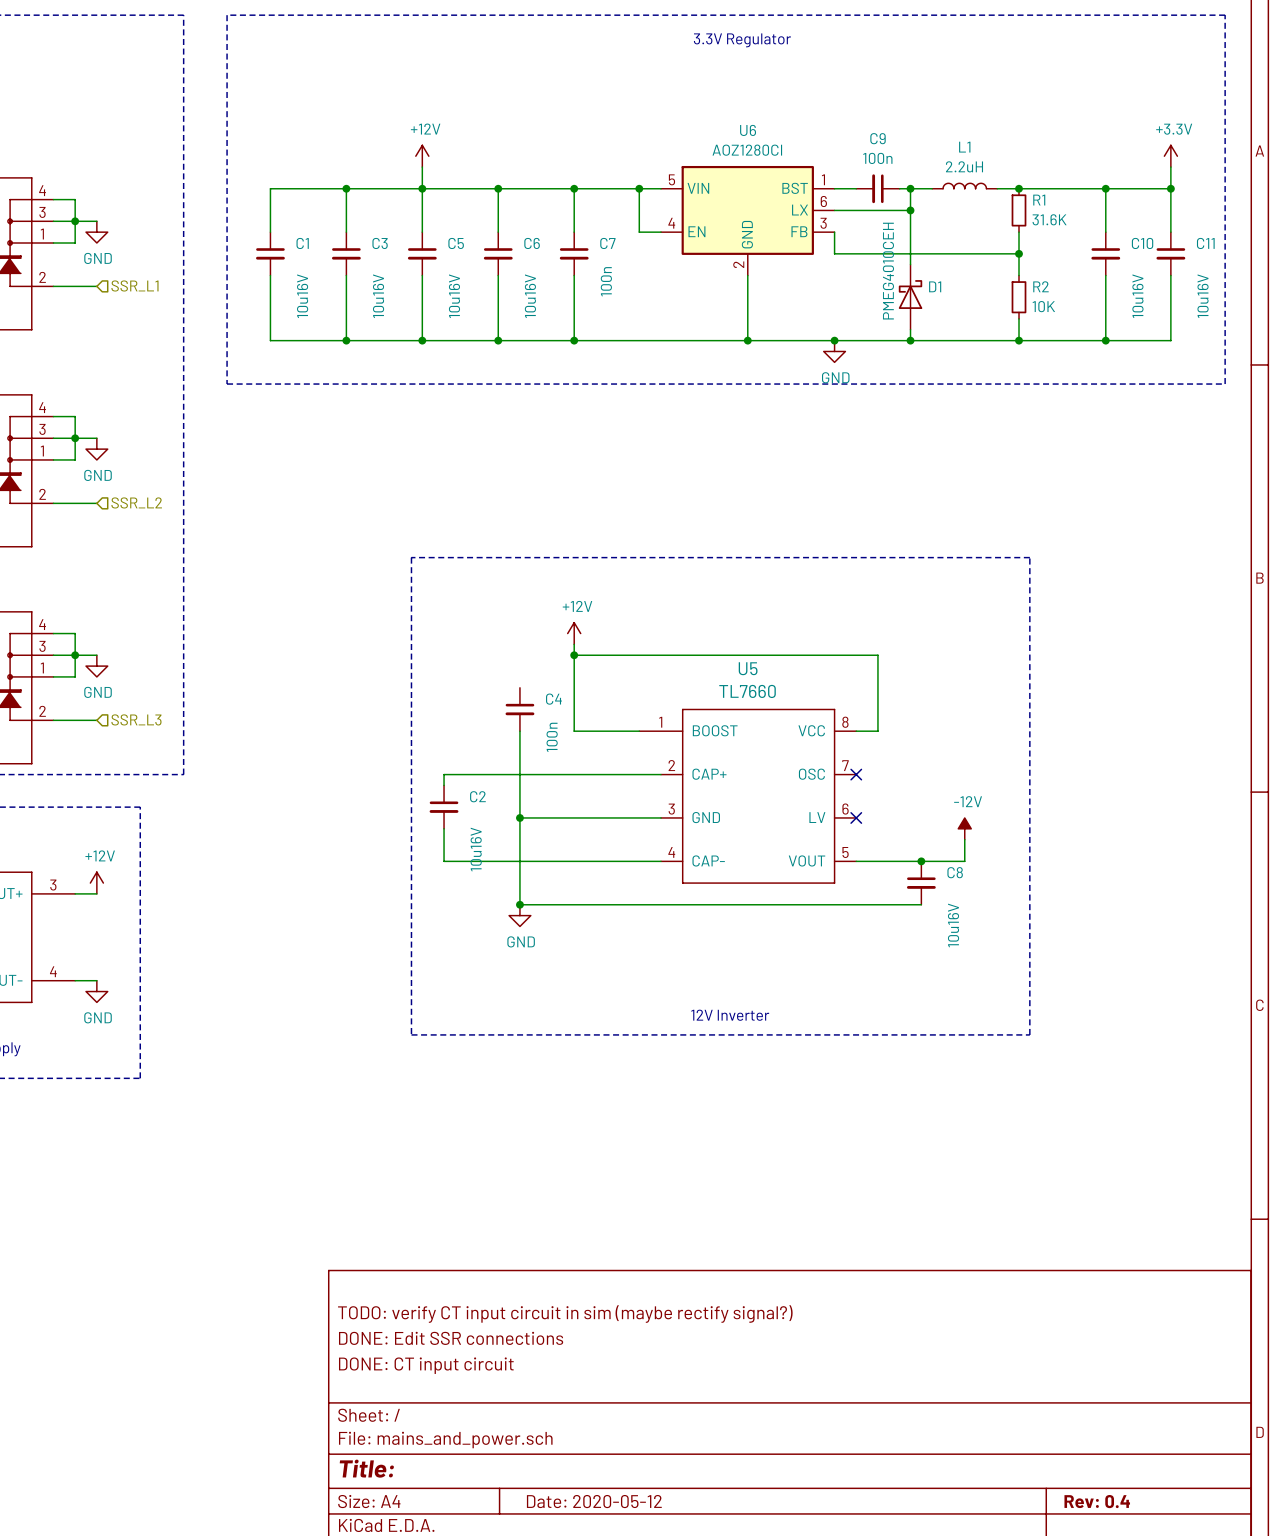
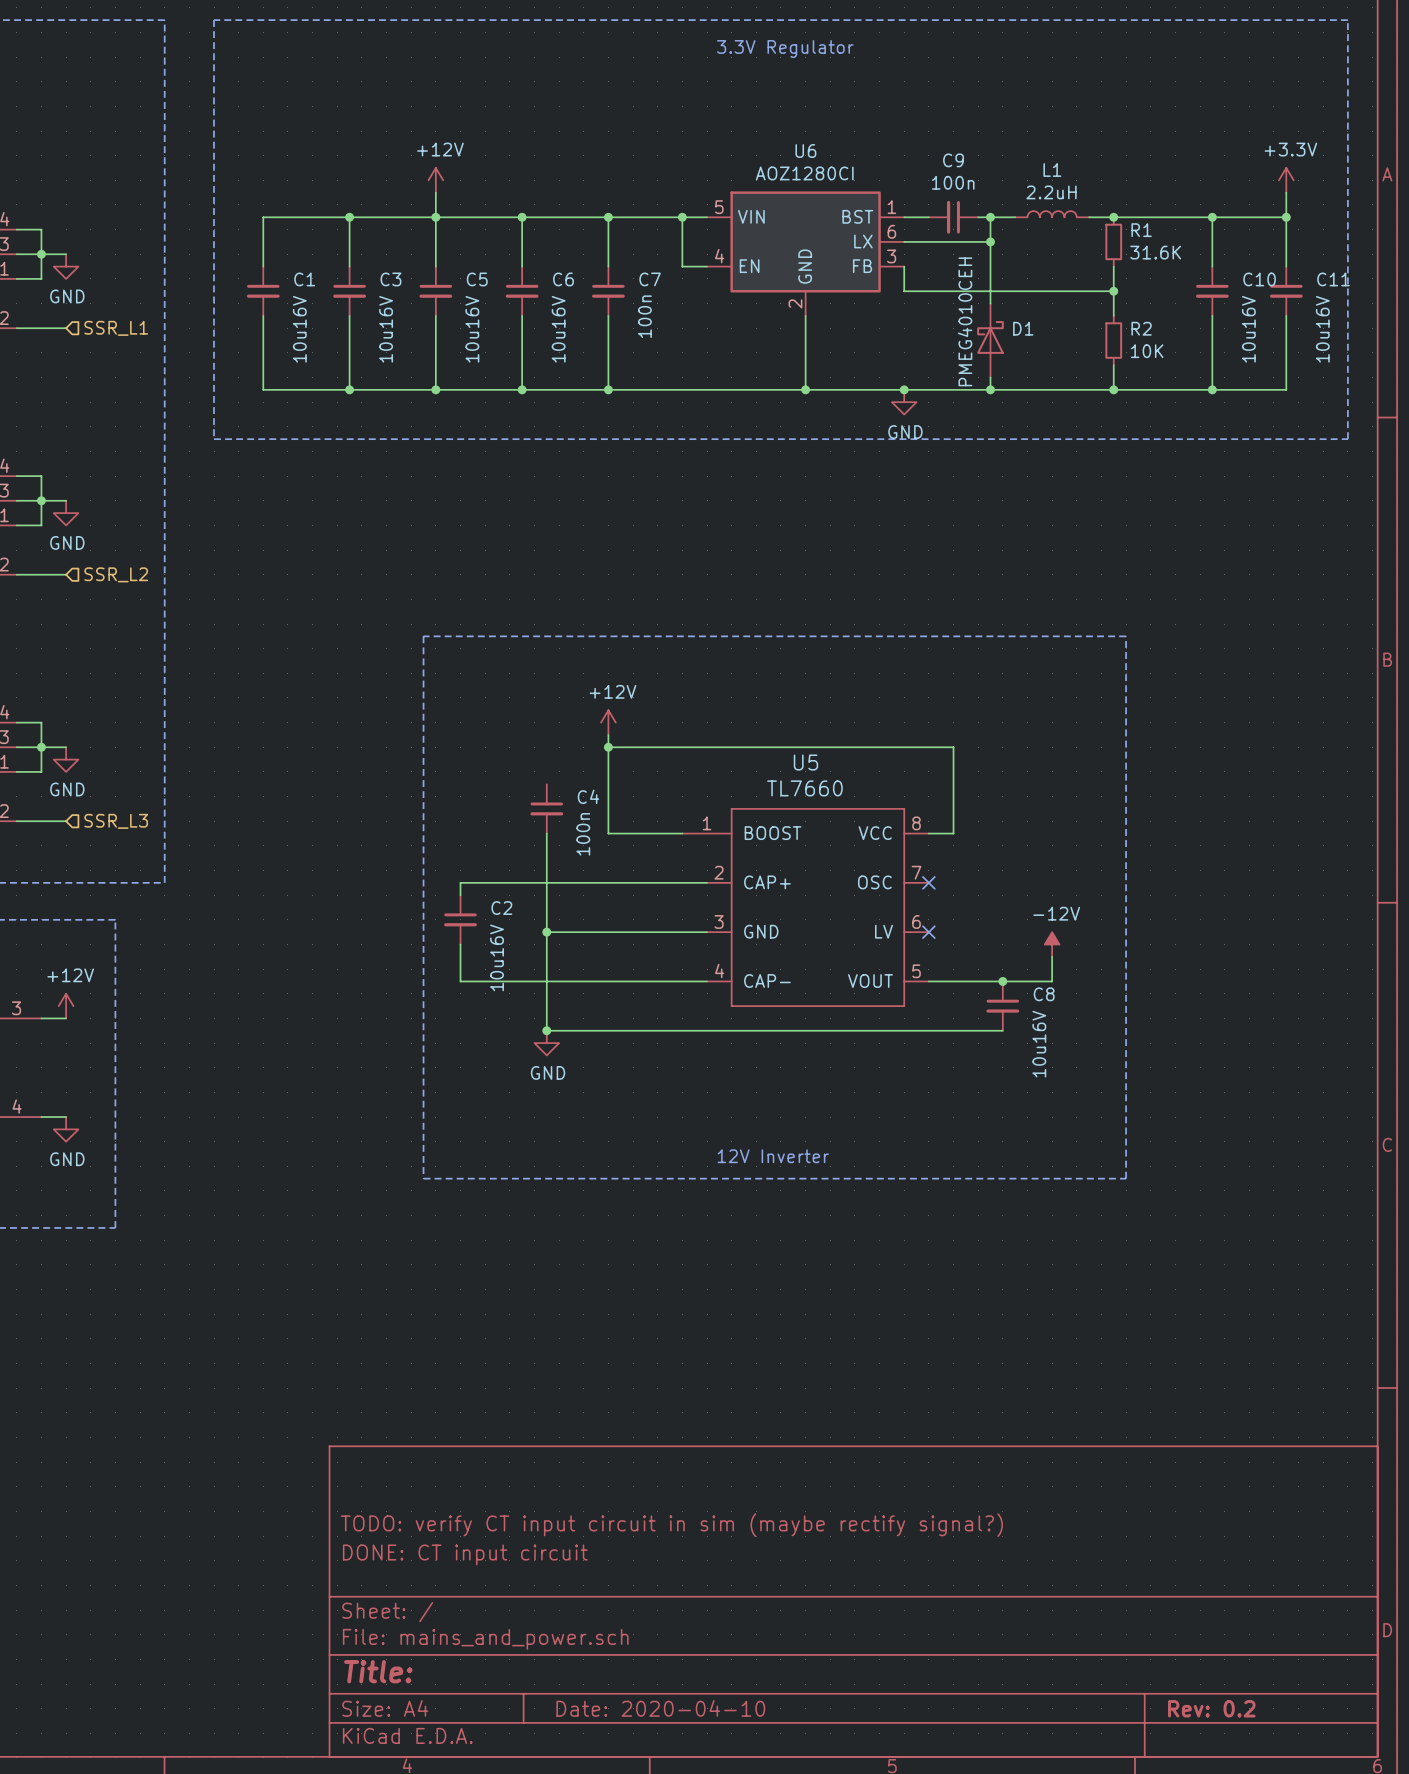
title block: TODO: verify CT input circuit in sim (maybe rectify signal?) (565, 1314) -> none
title block: DONE: Edit SSR connections (451, 1338) -> TODO: verify CT input circuit in sim (maybe rectify signal?) (671, 1525)
title block: Date: 2020-05-12 (594, 1501) -> Date: 2020-04-10 (660, 1708)
title block: Rev: 0.4 (1097, 1501) -> Rev: 0.2 (1211, 1708)

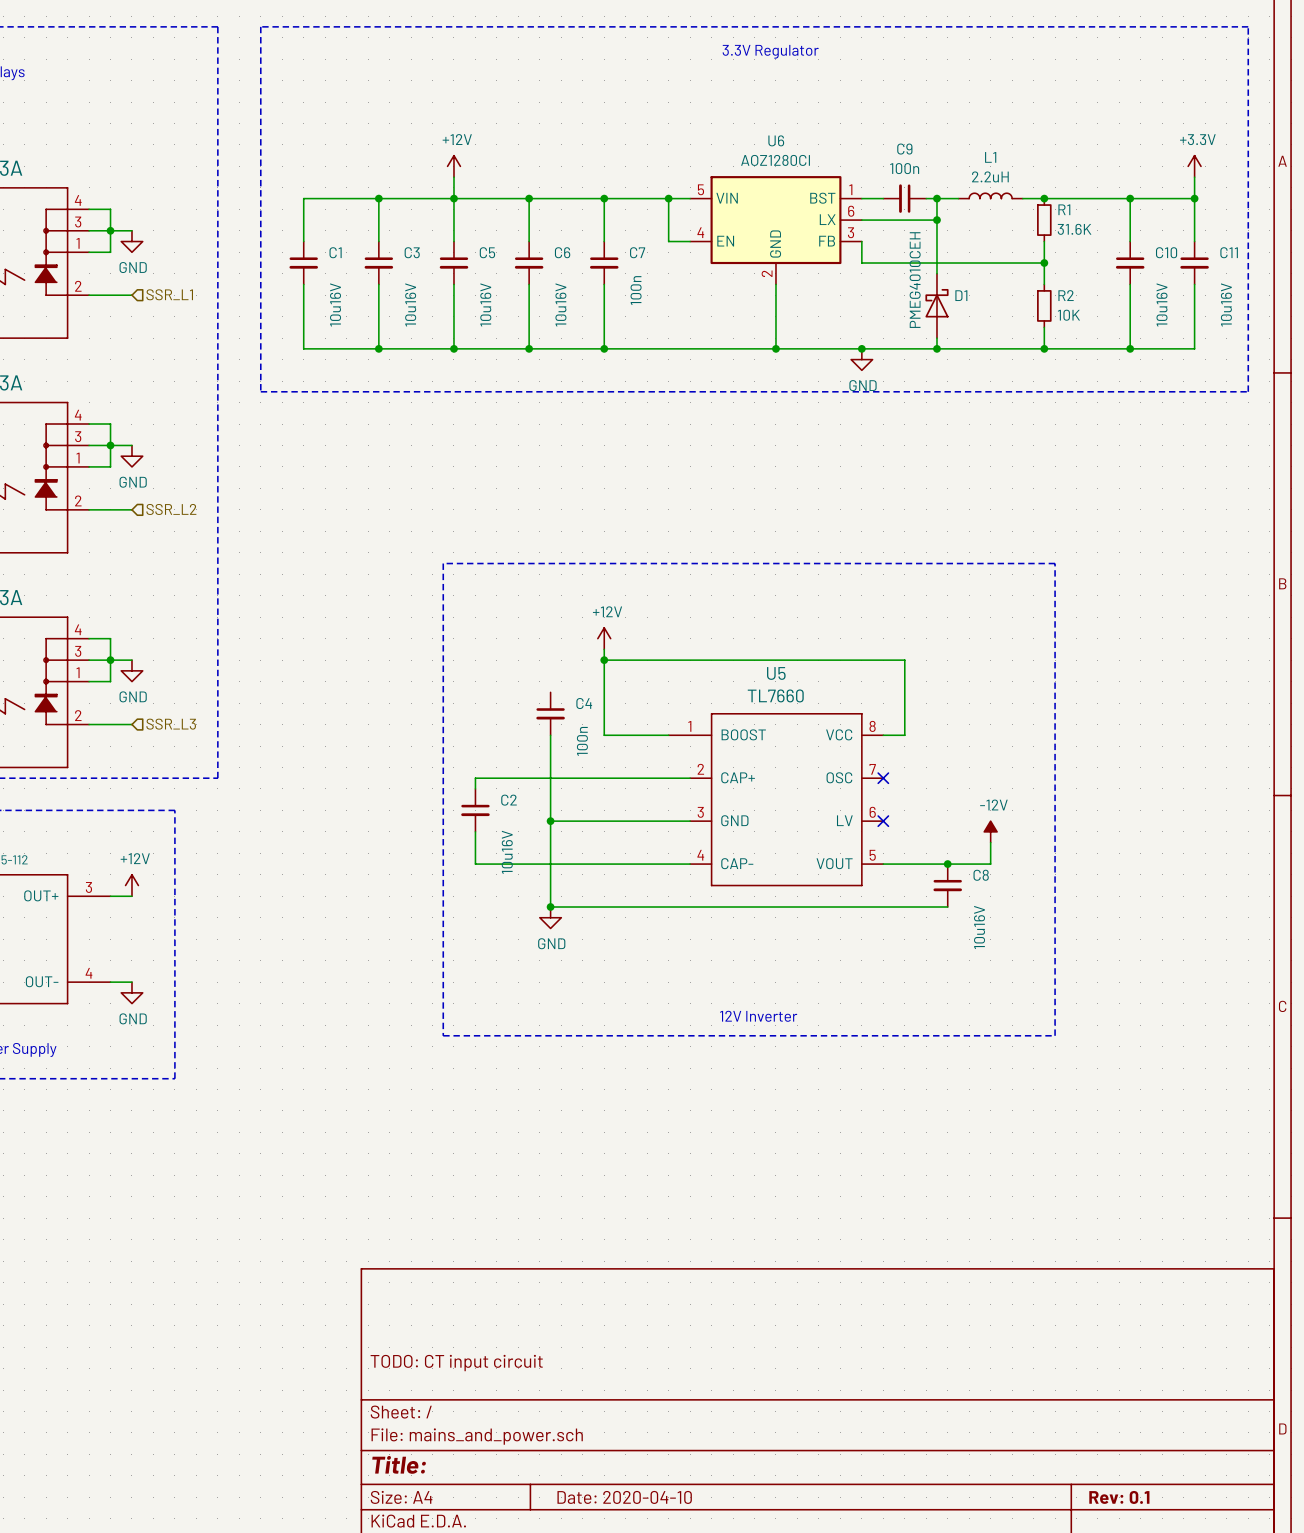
title block: TODO: verify CT input circuit in sim (maybe rectify signal?) (671, 1525) -> none
title block: DONE: CT input circuit (465, 1554) -> TODO: CT input circuit (456, 1363)
title block: Rev: 0.2 (1211, 1708) -> Rev: 0.1 (1119, 1497)

